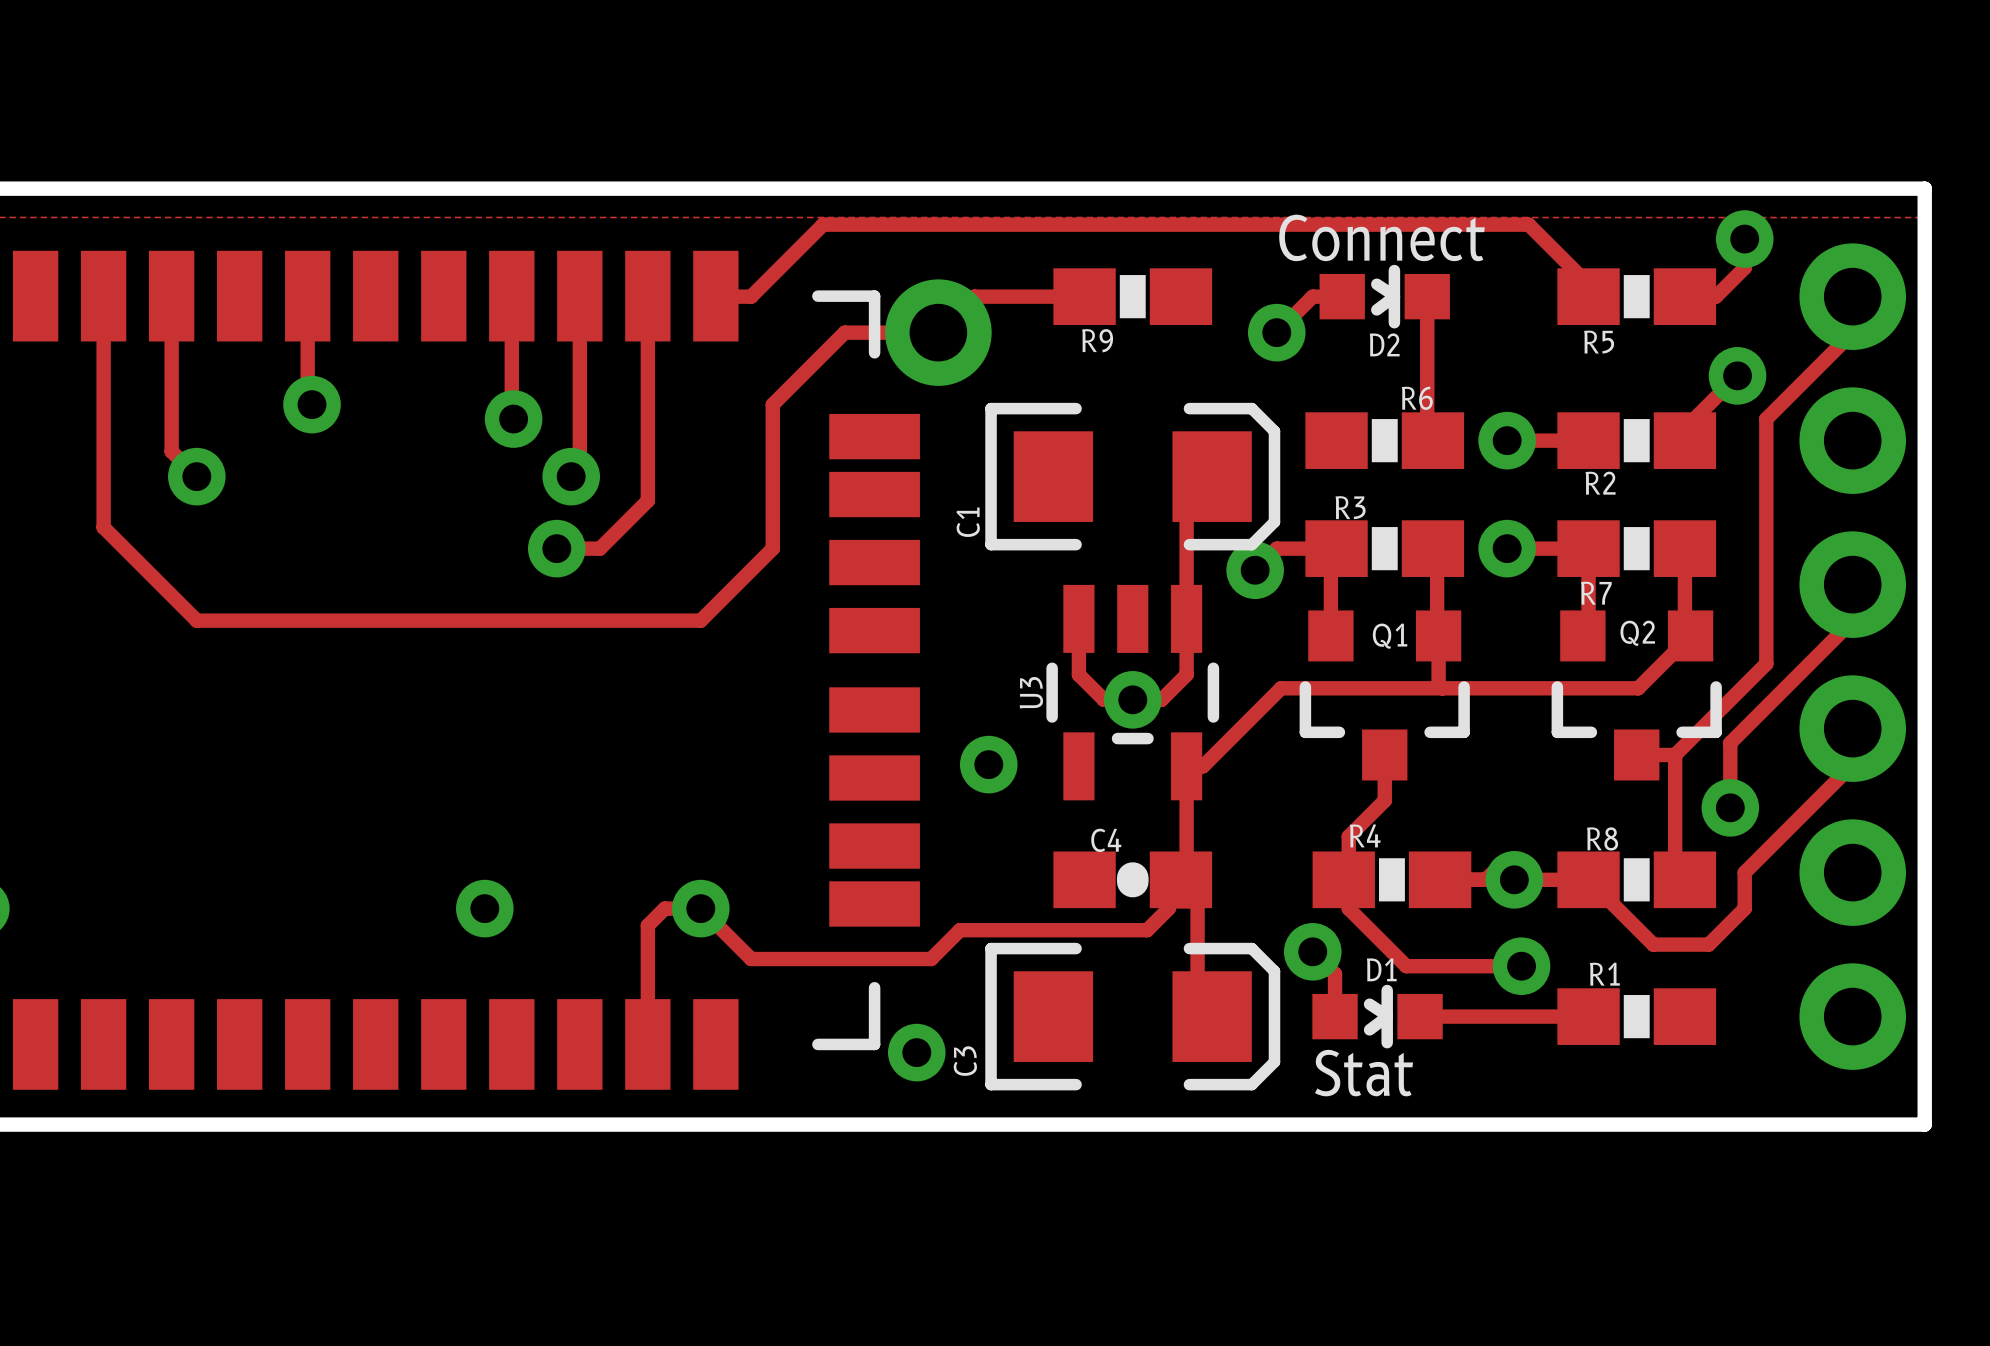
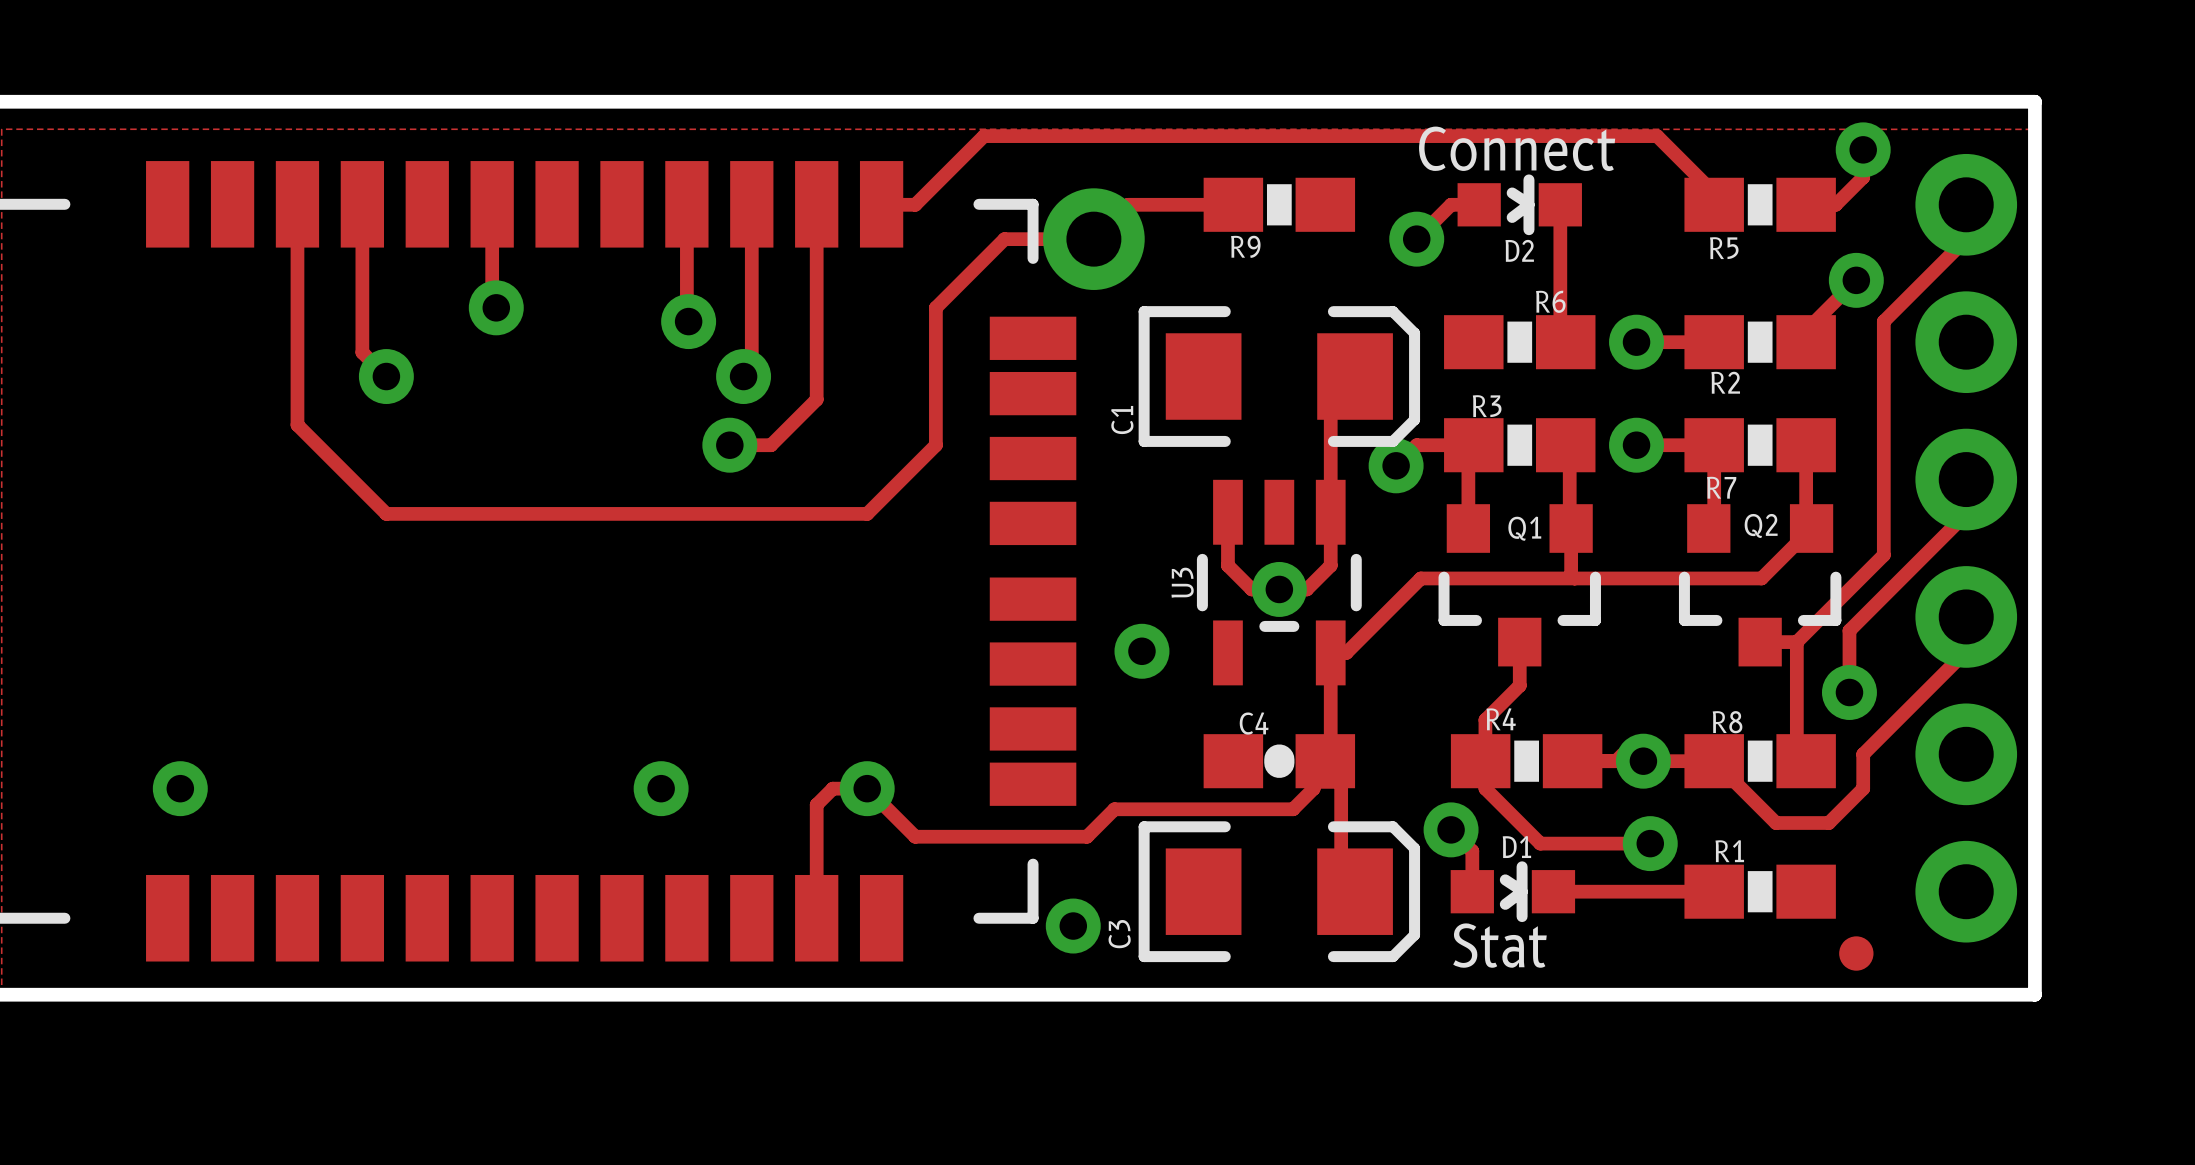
part: none -> (1856, 953)

